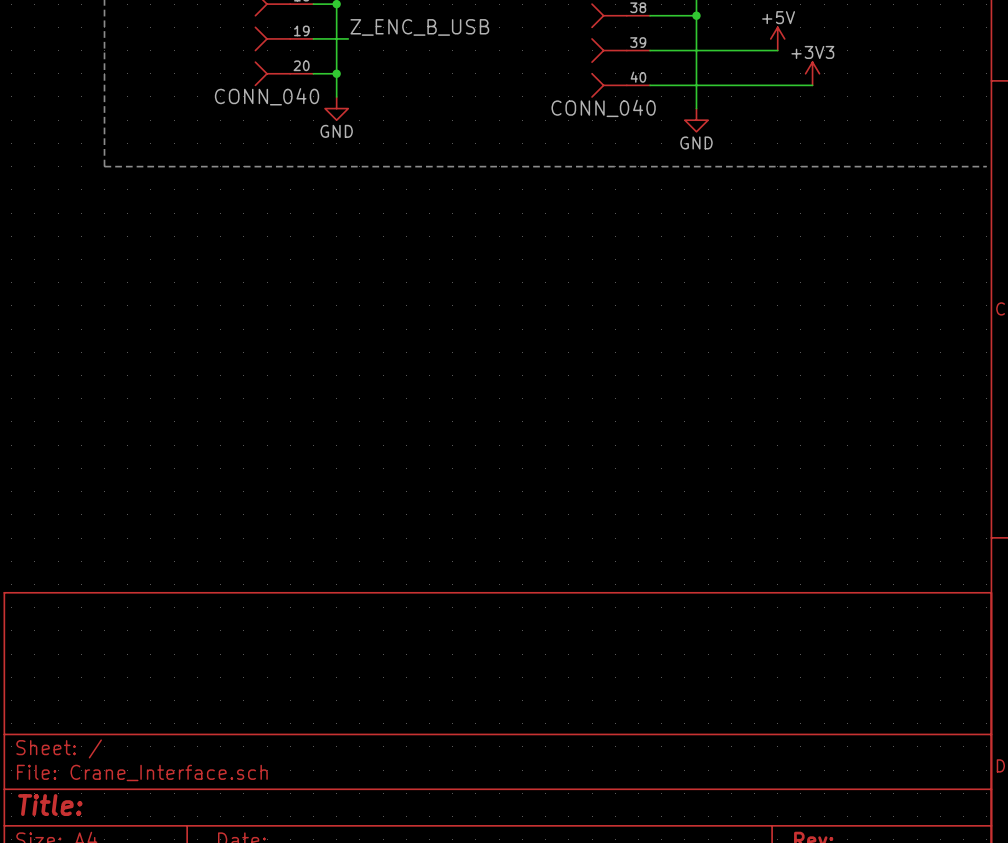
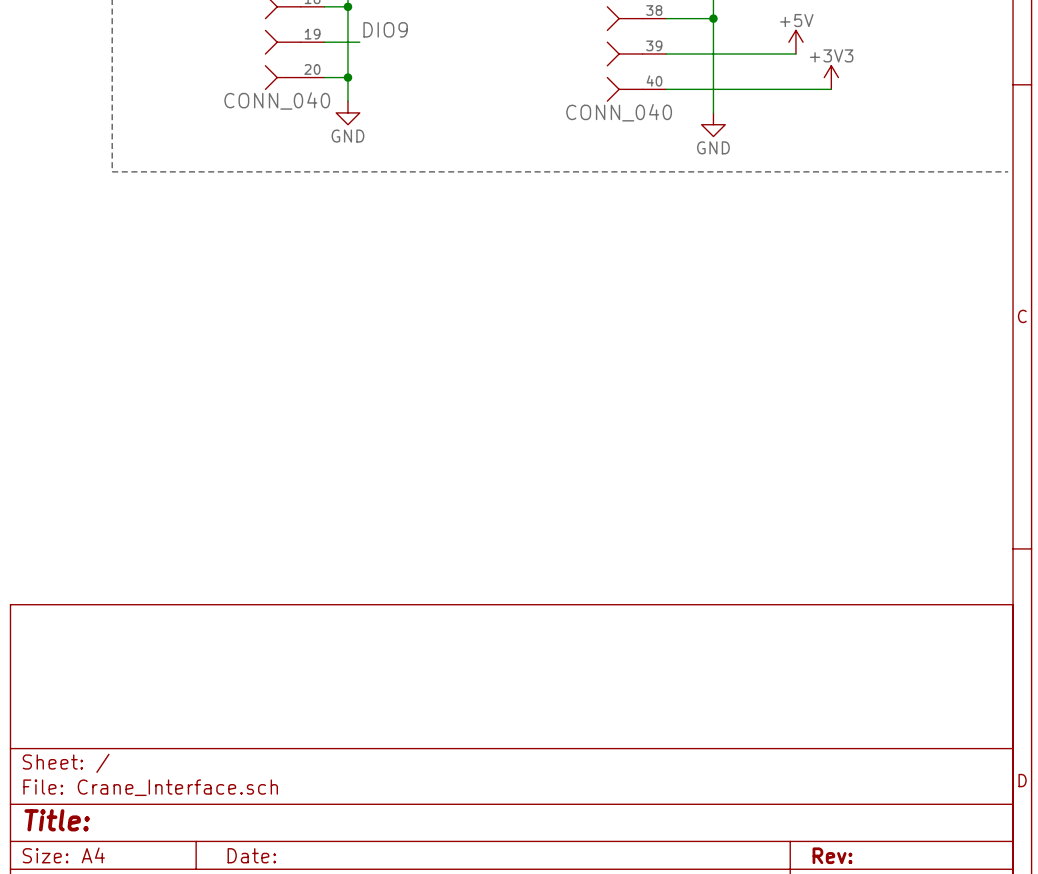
label: Z_ENC_B_USB (419, 27) -> DIO9 (385, 29)

